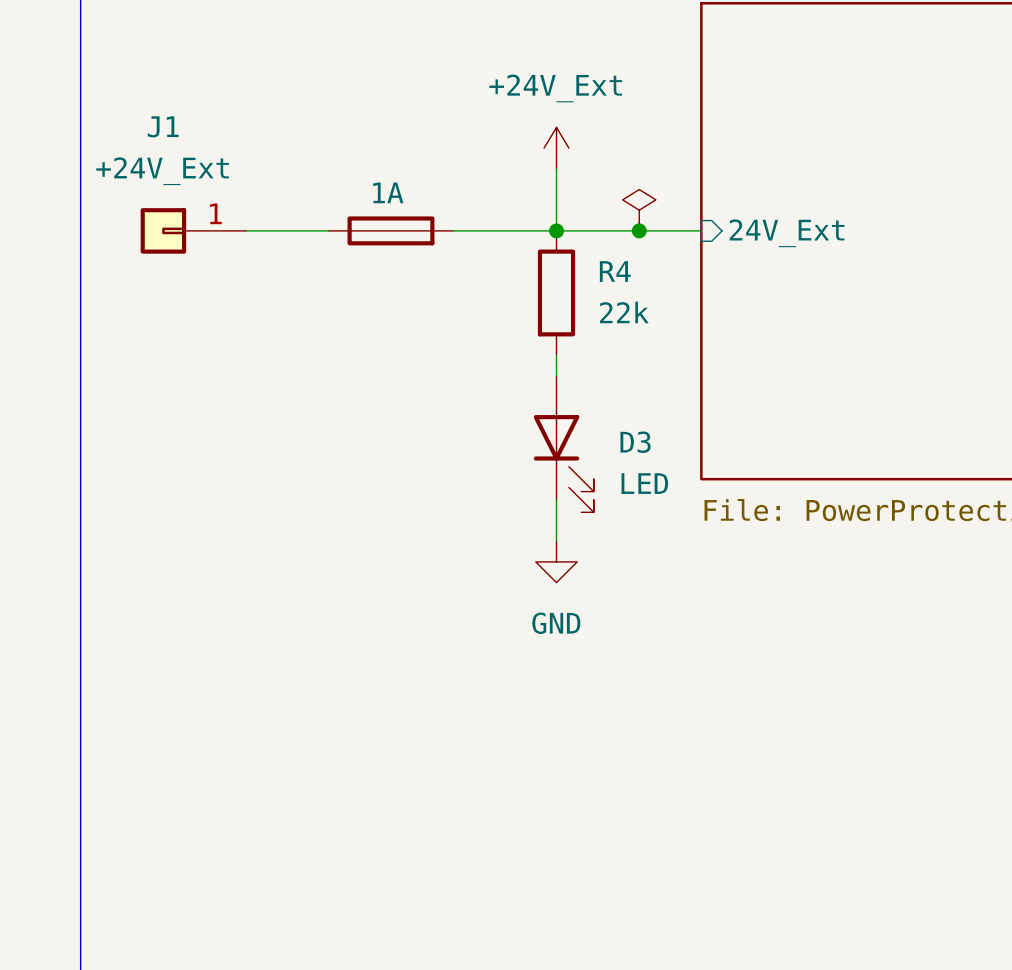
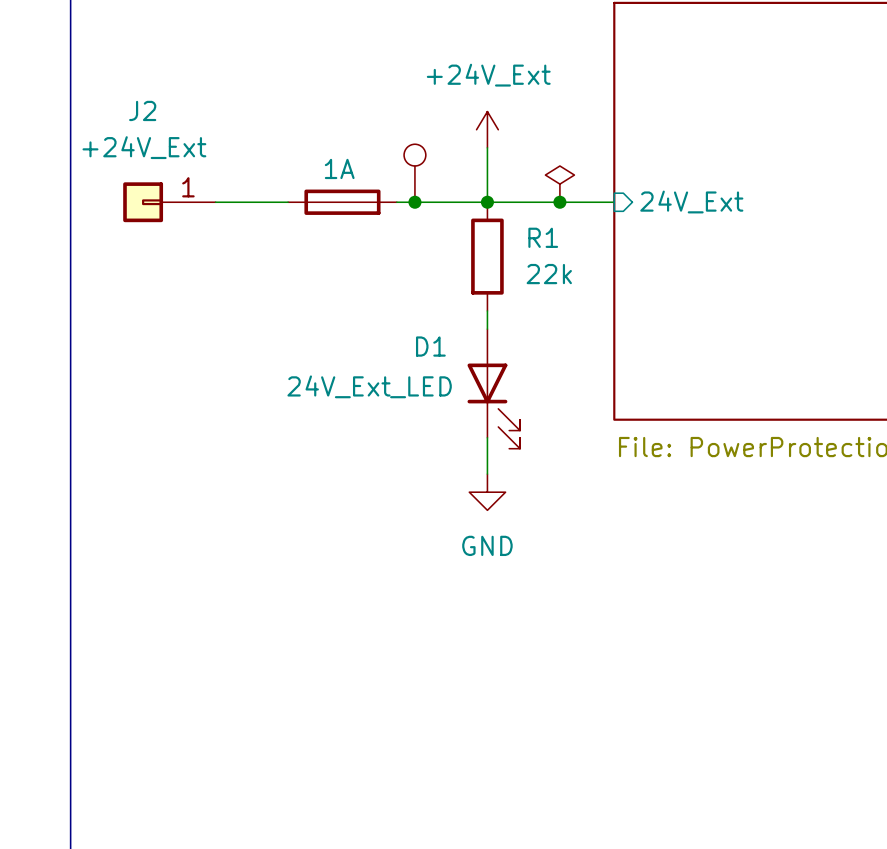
J1 name: J1 (163, 126) -> J2 (142, 110)
part: none -> (414, 173)
junction: none -> (414, 202)
R4 name: R4 (615, 271) -> R1 (543, 237)
D3 name: D3 (635, 442) -> D1 (430, 346)
D3 value: LED (644, 483) -> 24V_Ext_LED (369, 386)

